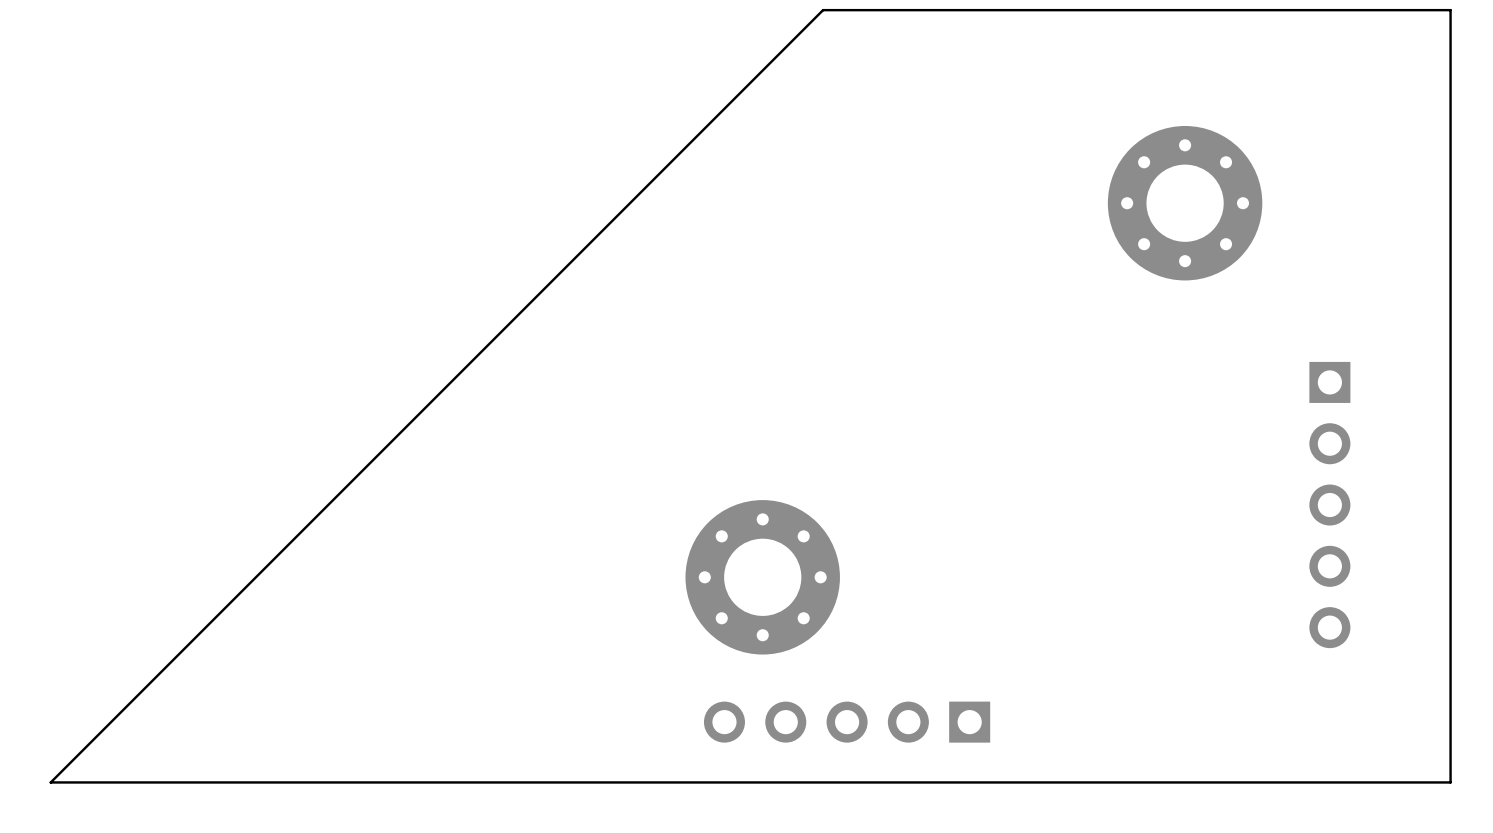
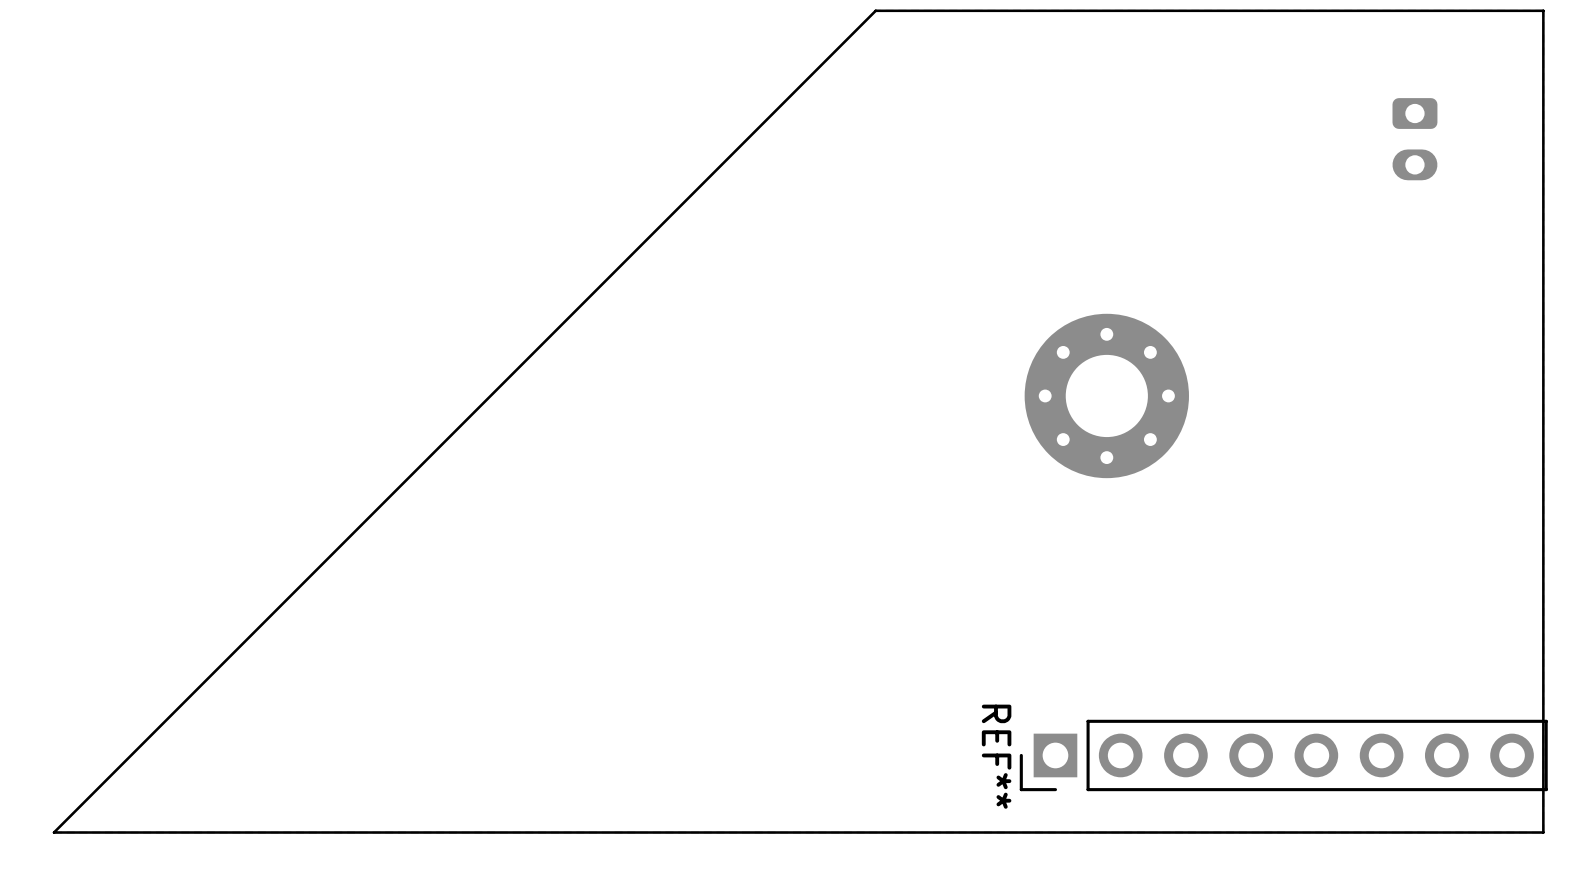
part: none -> (1414, 139)
part: (1185, 203) -> none
part: none -> (1106, 395)
part: (1329, 505) -> none
part: (762, 577) -> none
REF**: none -> (1283, 755)
part: (847, 722) -> none

